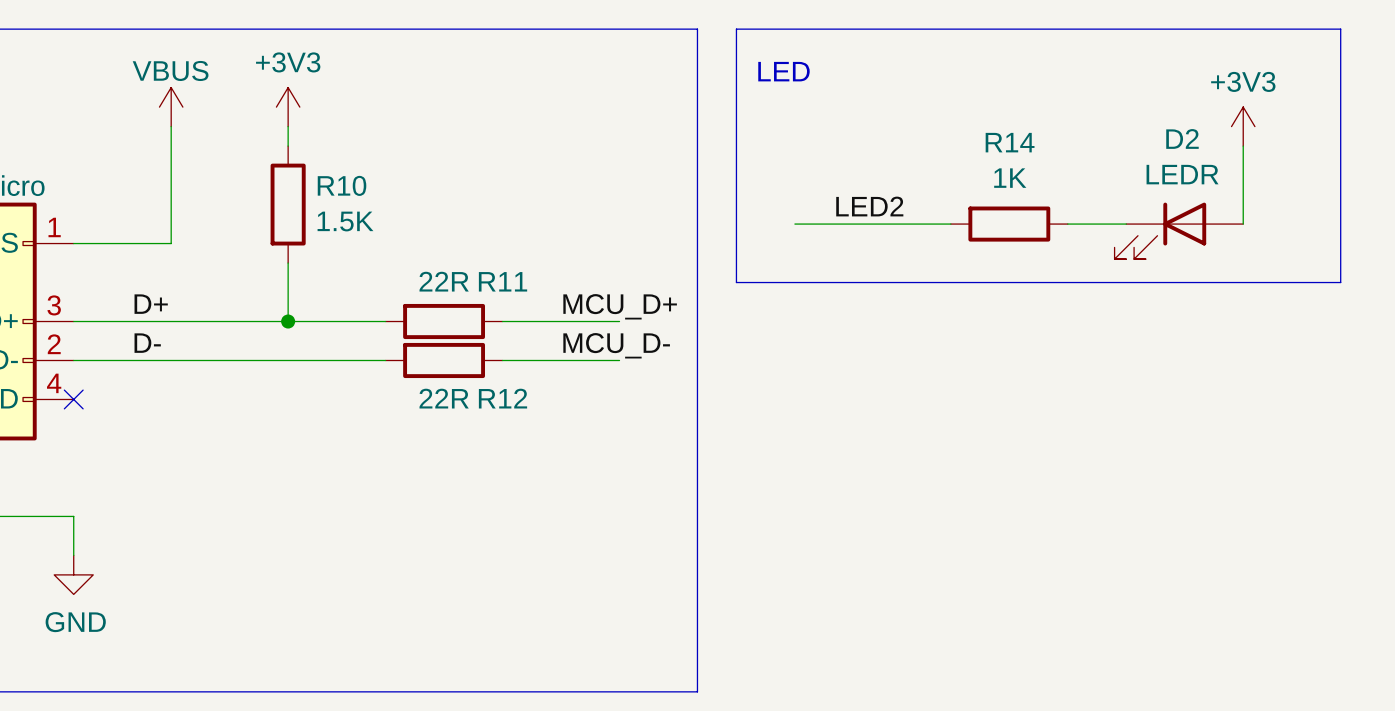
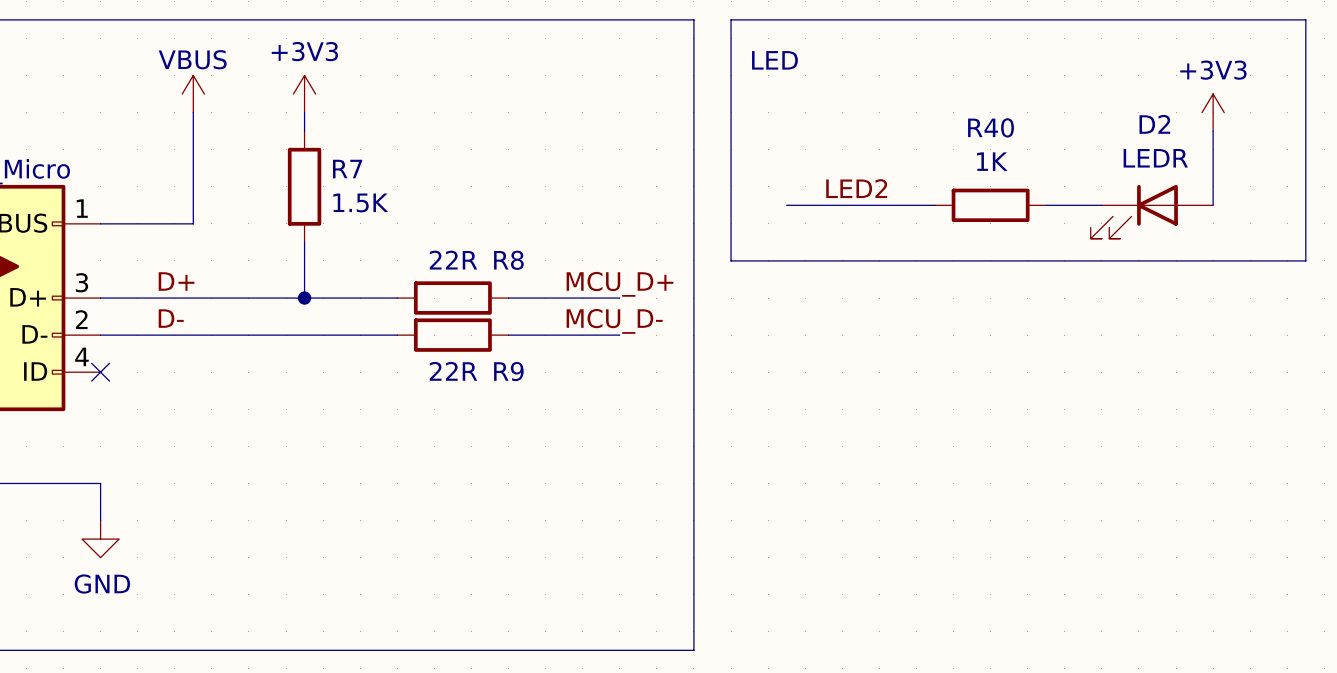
R14 name: R14 (1010, 142) -> R40 (991, 127)
R10 name: R10 (342, 185) -> R7 (347, 169)
R11 name: R11 (503, 281) -> R8 (508, 260)
R12 name: R12 (502, 398) -> R9 (508, 371)

